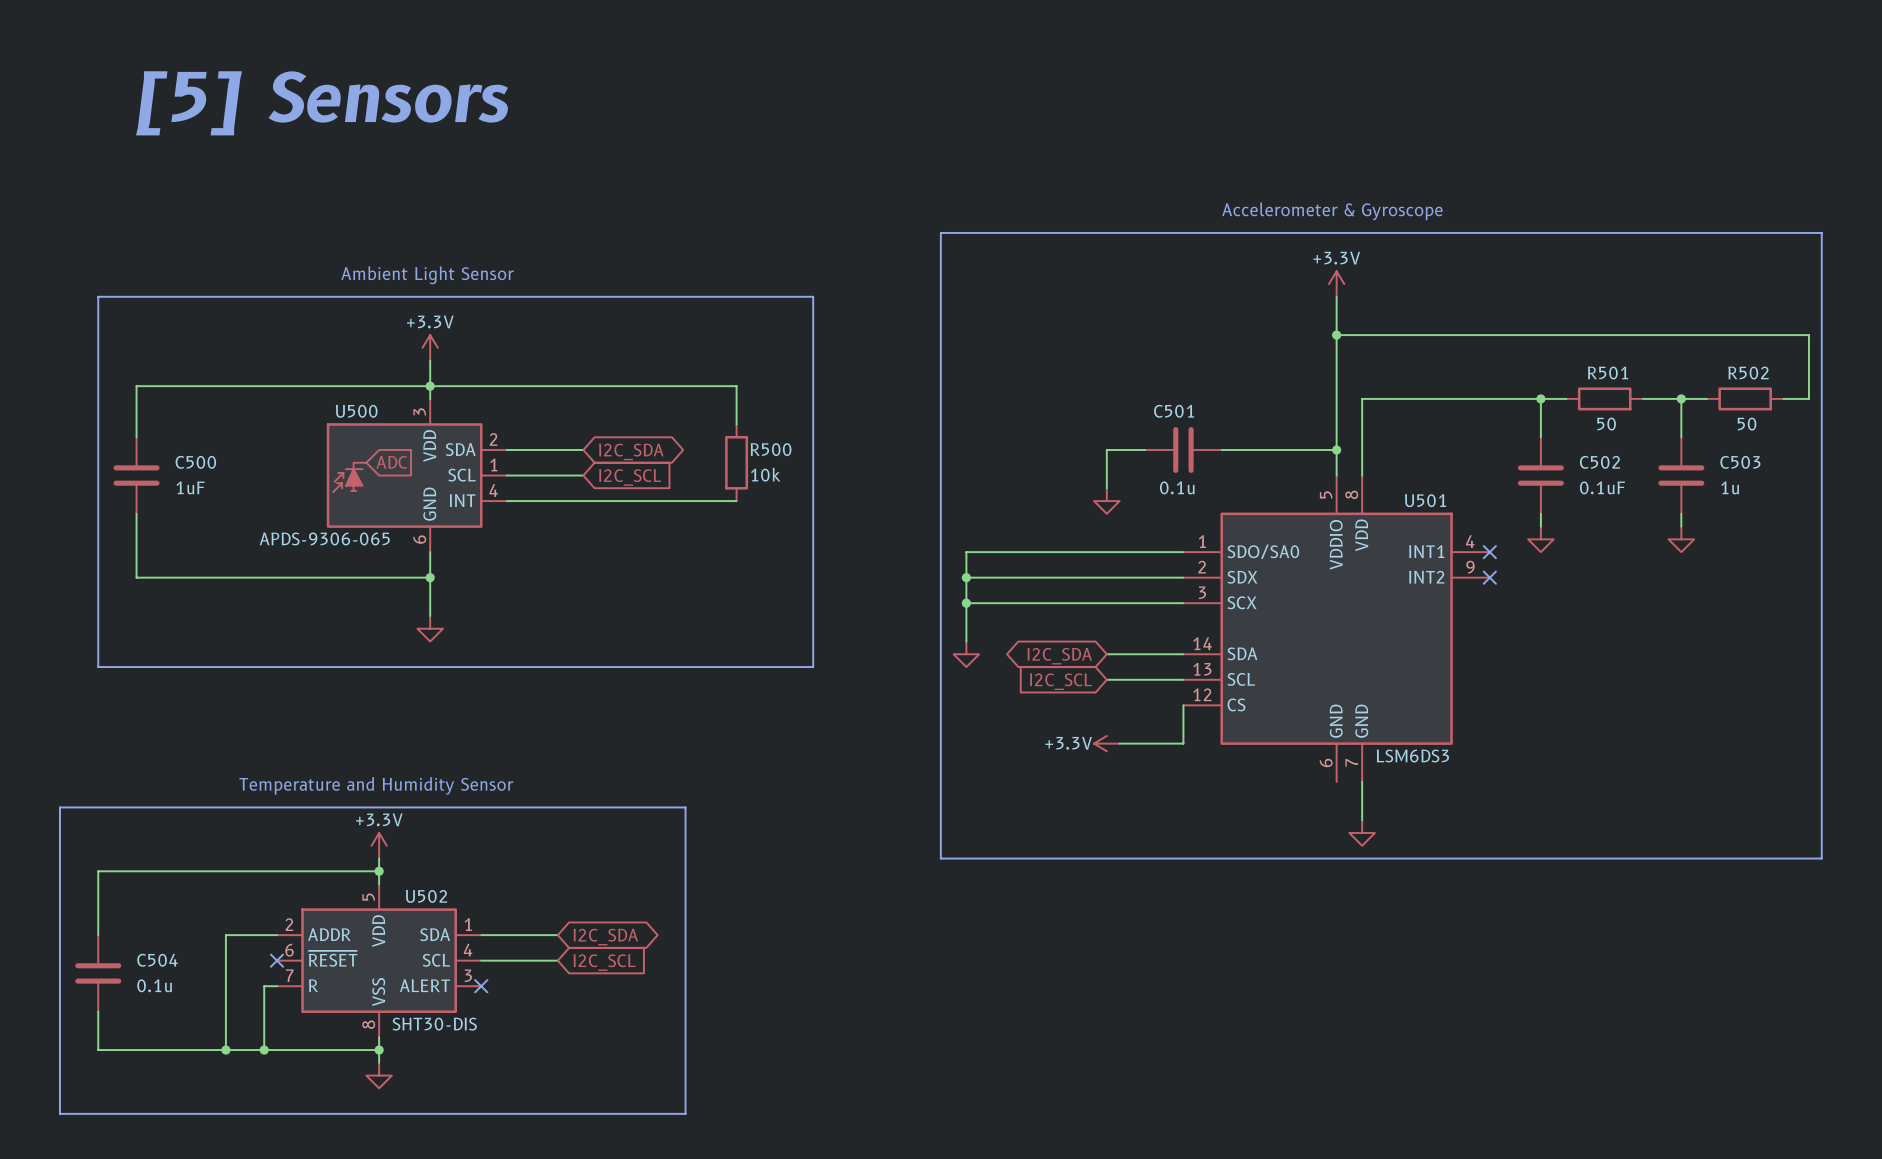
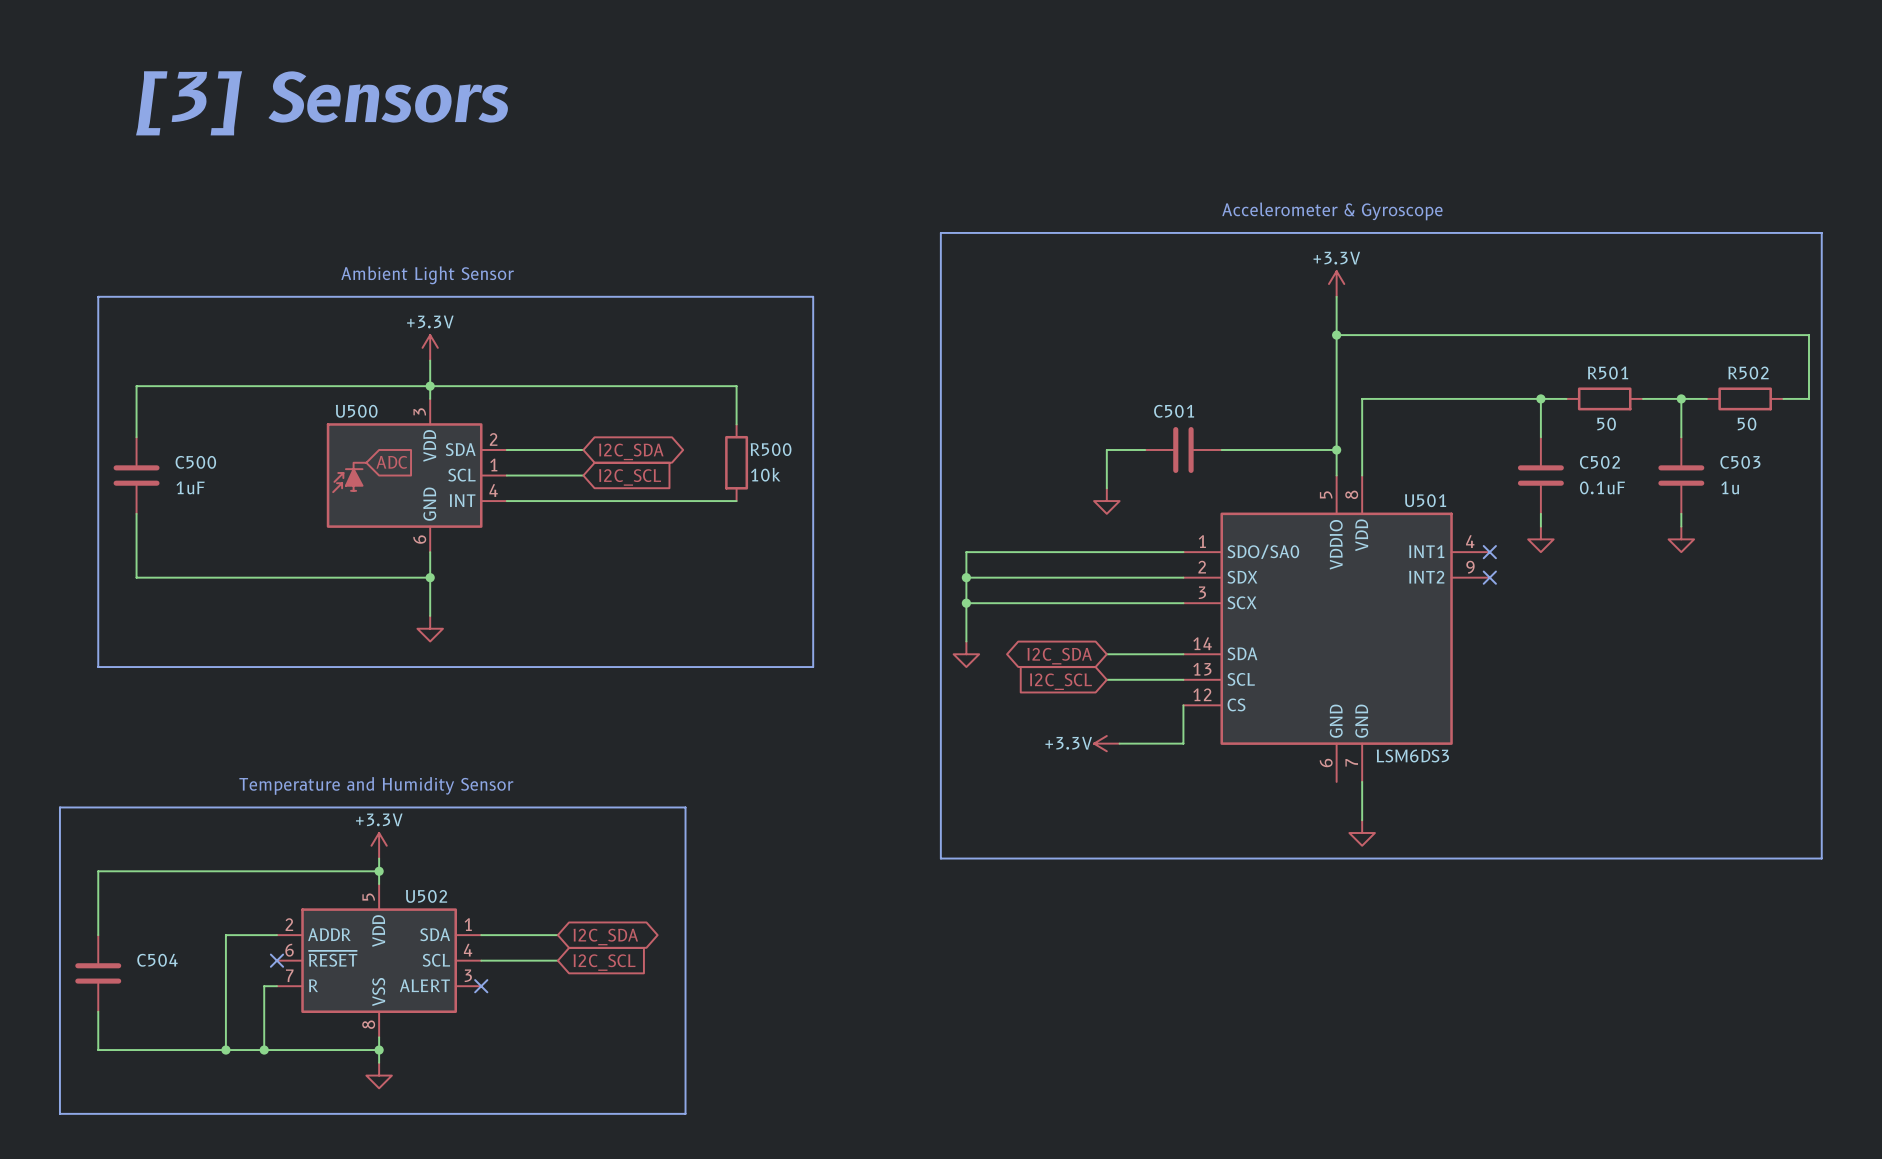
text: [5] Sensors (322, 103) -> [3] Sensors (322, 103)
C501 value: 0.1u (1177, 487) -> none
U500 value: APDS-9306-065 (324, 538) -> none
C504 value: 0.1u (154, 985) -> none
U502 value: SHT30-DIS (434, 1024) -> none

